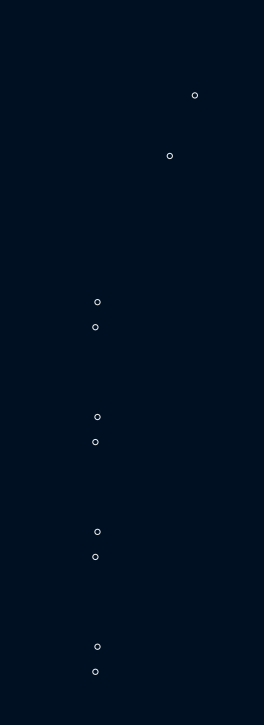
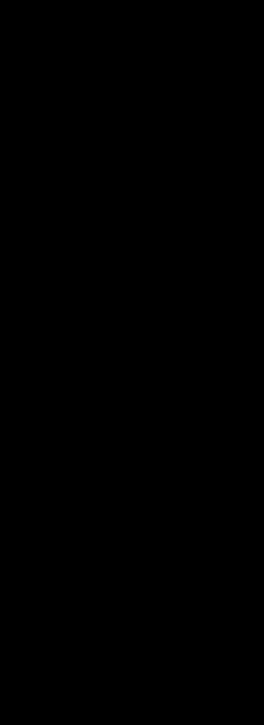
via: (194, 95) -> none
via: (169, 155) -> none
via: (97, 302) -> none
via: (95, 327) -> none
via: (97, 417) -> none
via: (95, 442) -> none
via: (97, 531) -> none
via: (95, 556) -> none
via: (97, 646) -> none
via: (95, 671) -> none

